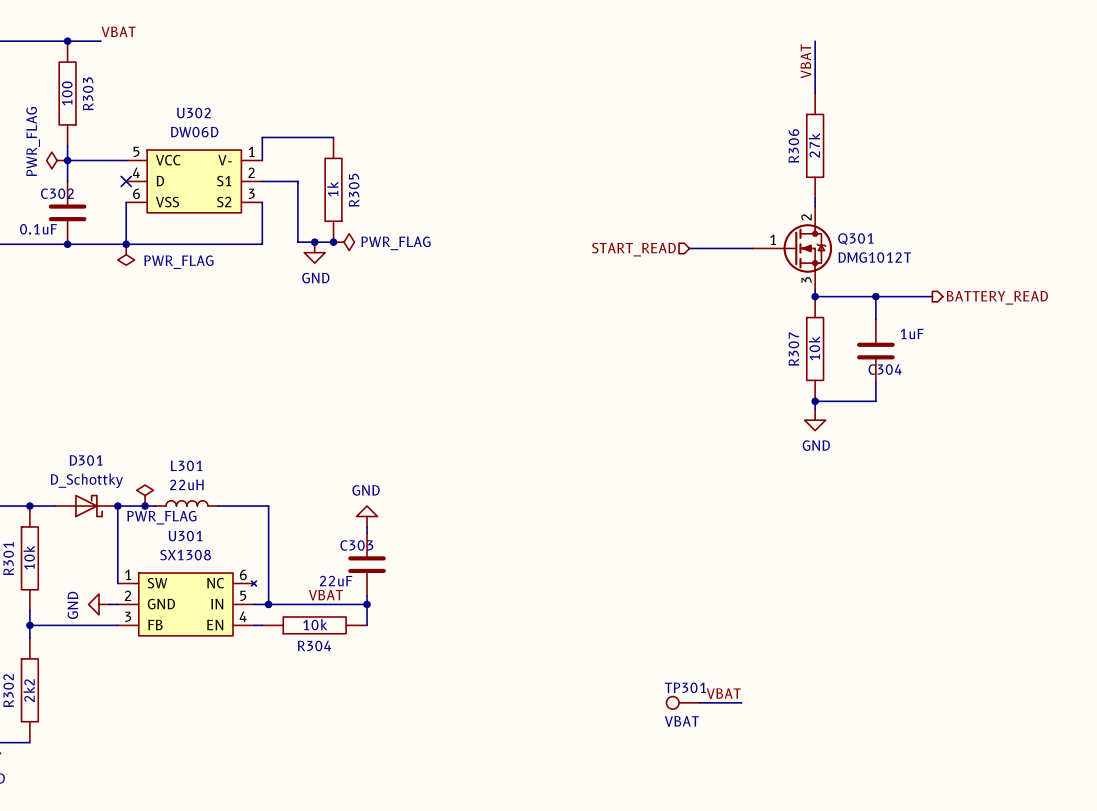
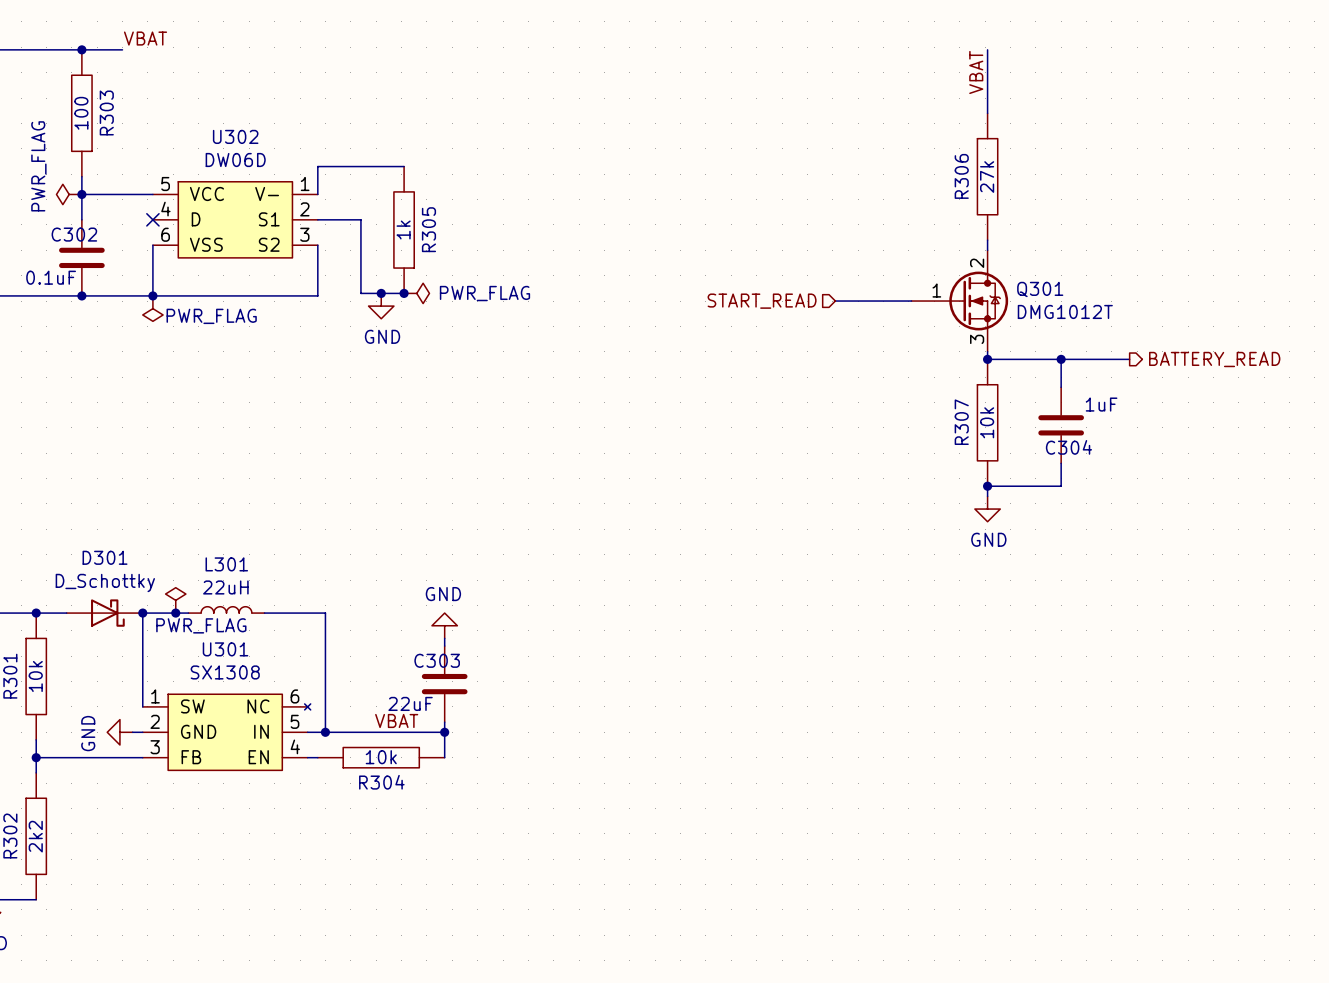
label: VBAT (723, 693) -> none
TP301: VBAT (683, 702) -> none
wire: (699, 702) (741, 702) -> none

